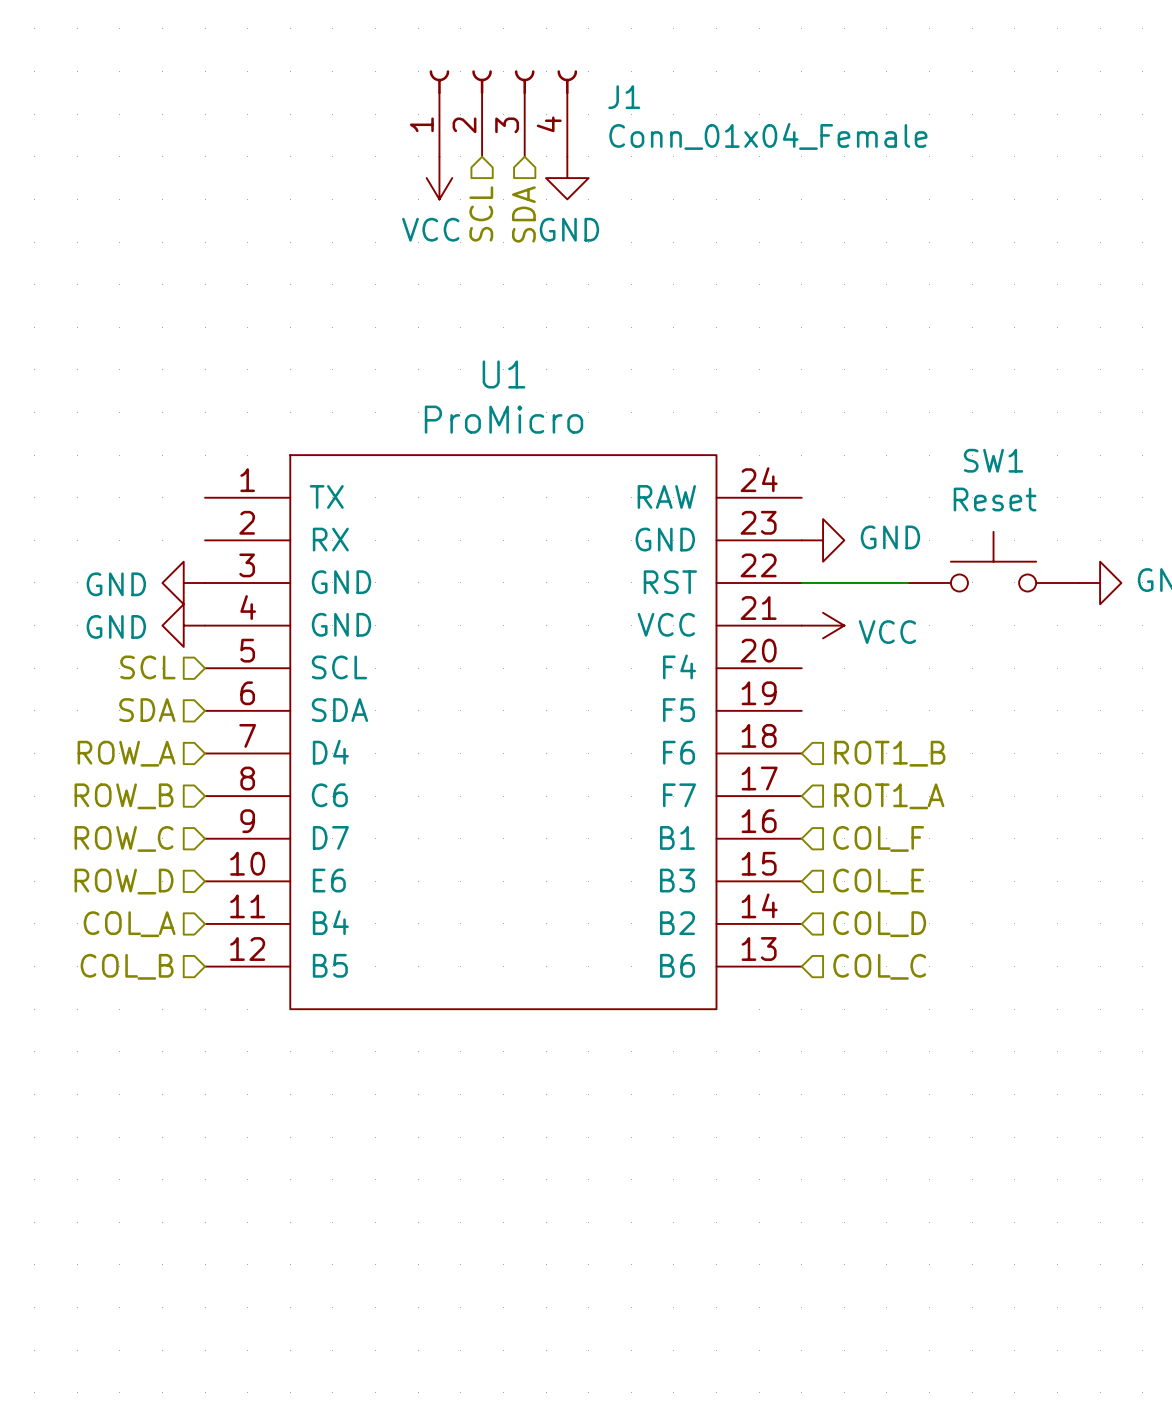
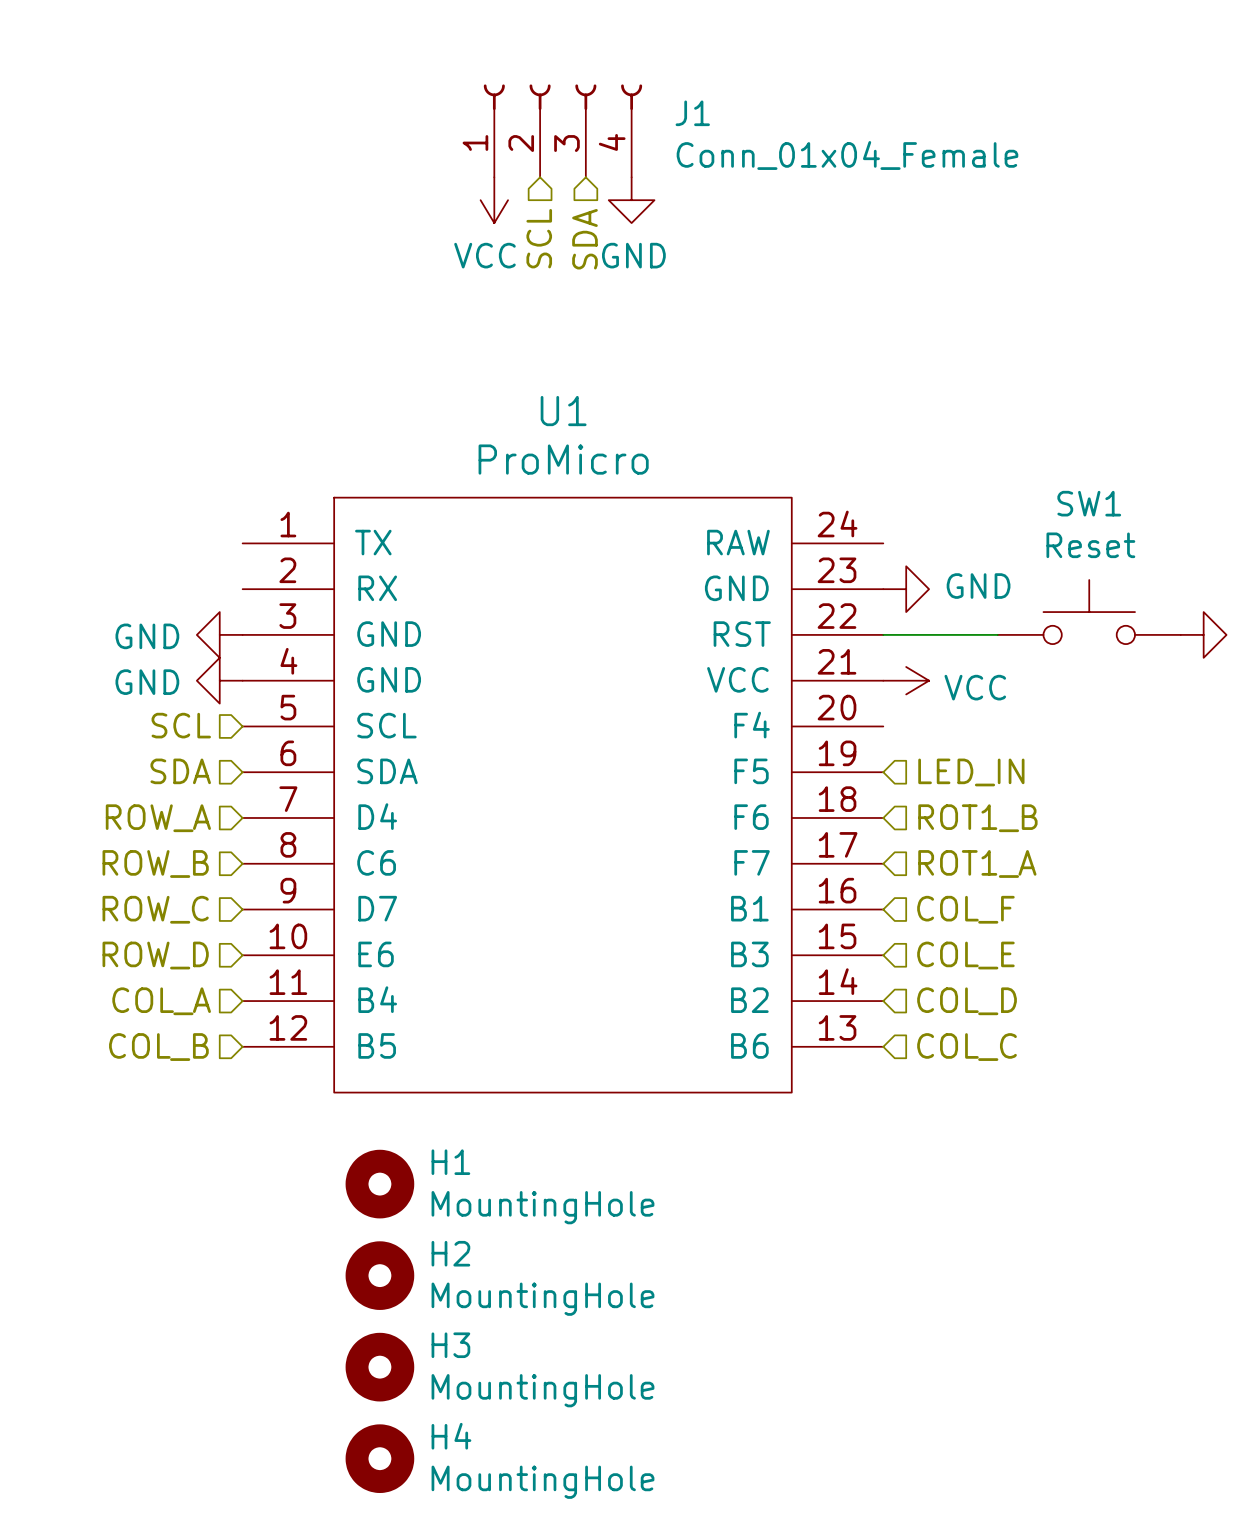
hierarchical label: none -> LED_IN (971, 772)
H1: none -> MountingHole (379, 1184)
H2: none -> MountingHole (379, 1275)
H3: none -> MountingHole (379, 1367)
H4: none -> MountingHole (379, 1458)

